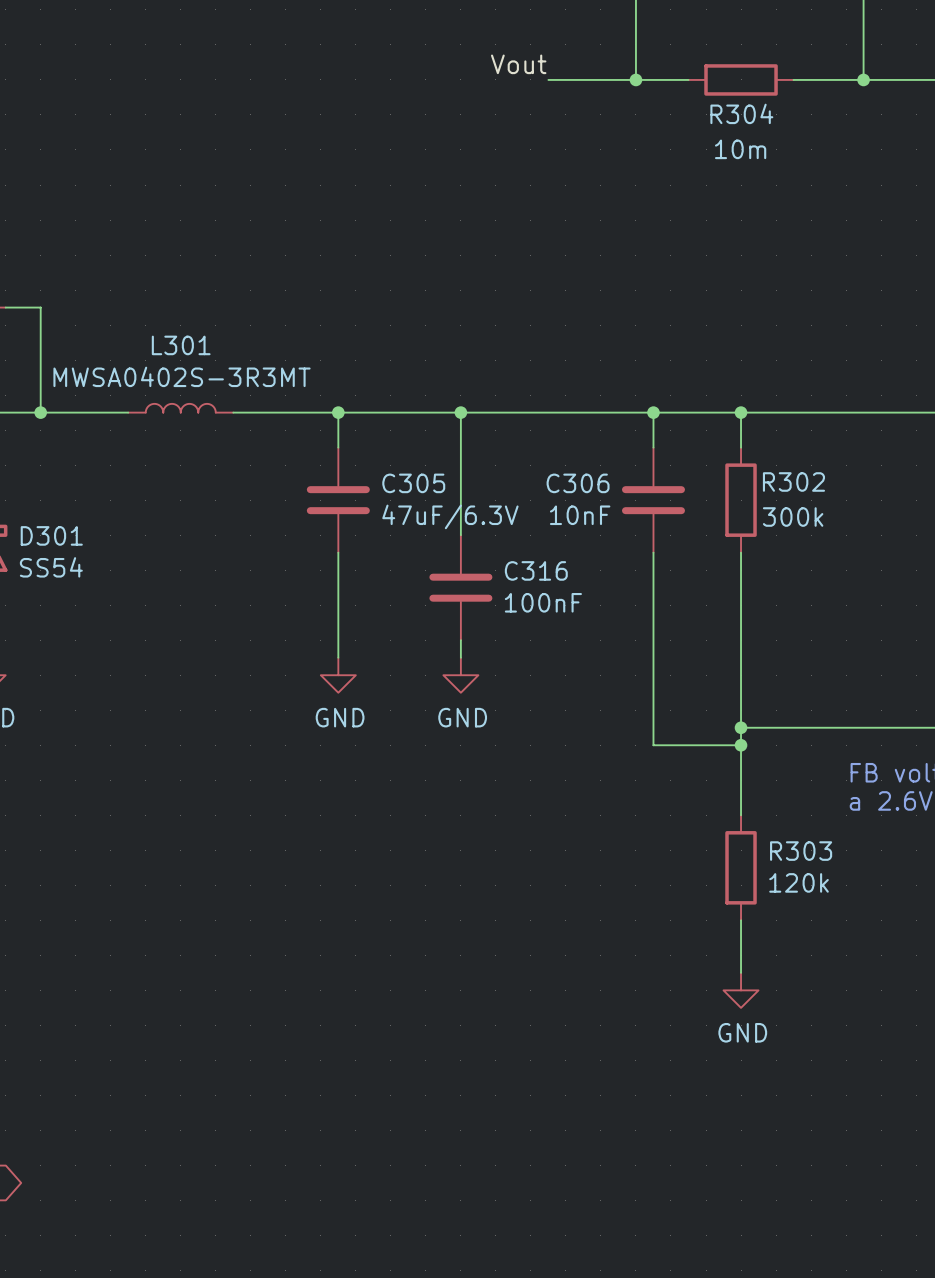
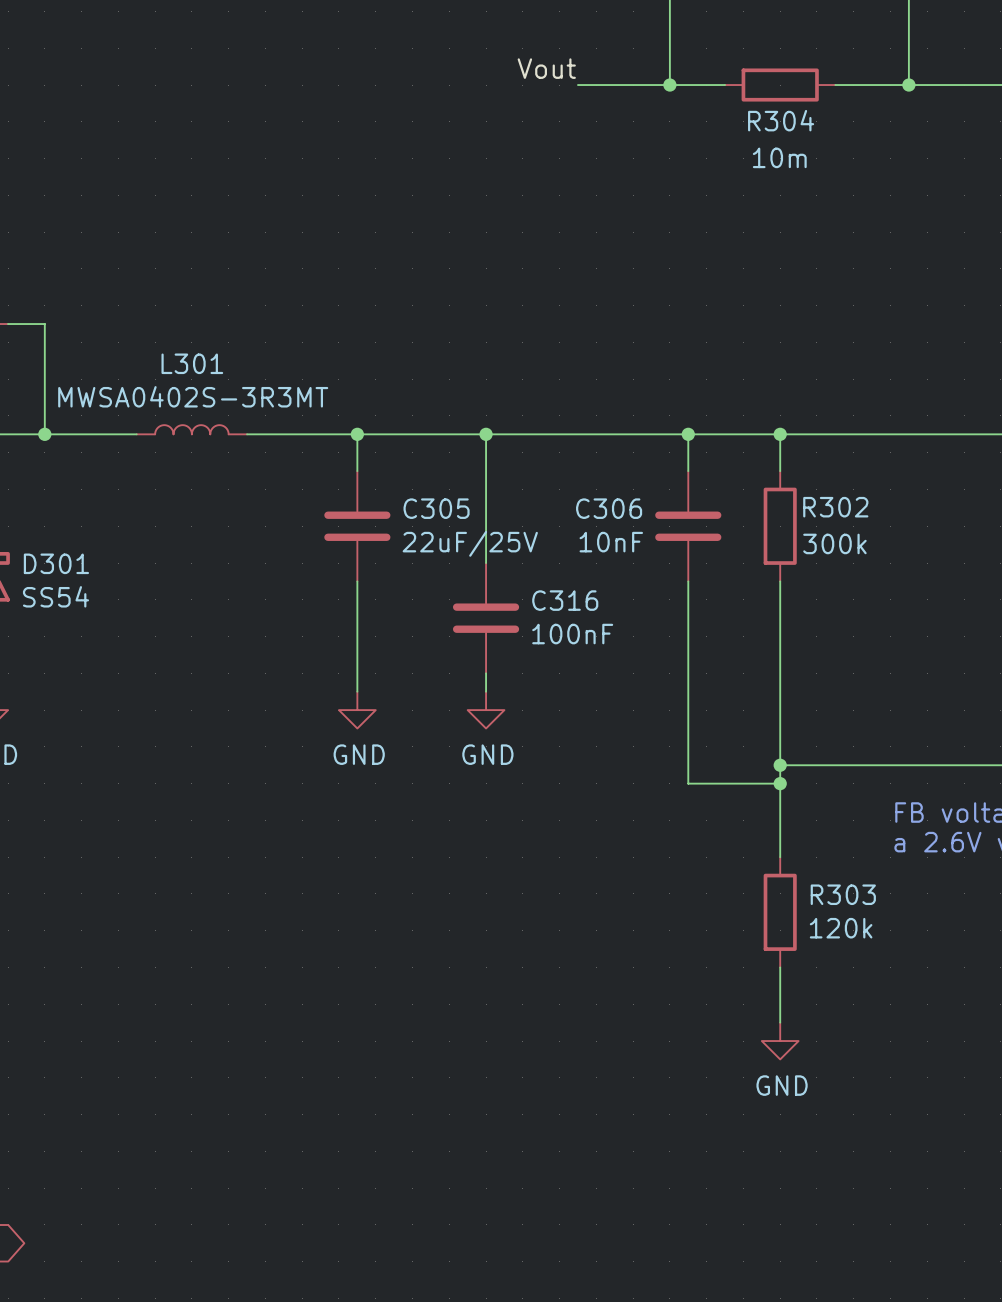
C305 value: 47uF/6.3V (450, 516) -> 22uF/25V (470, 543)

